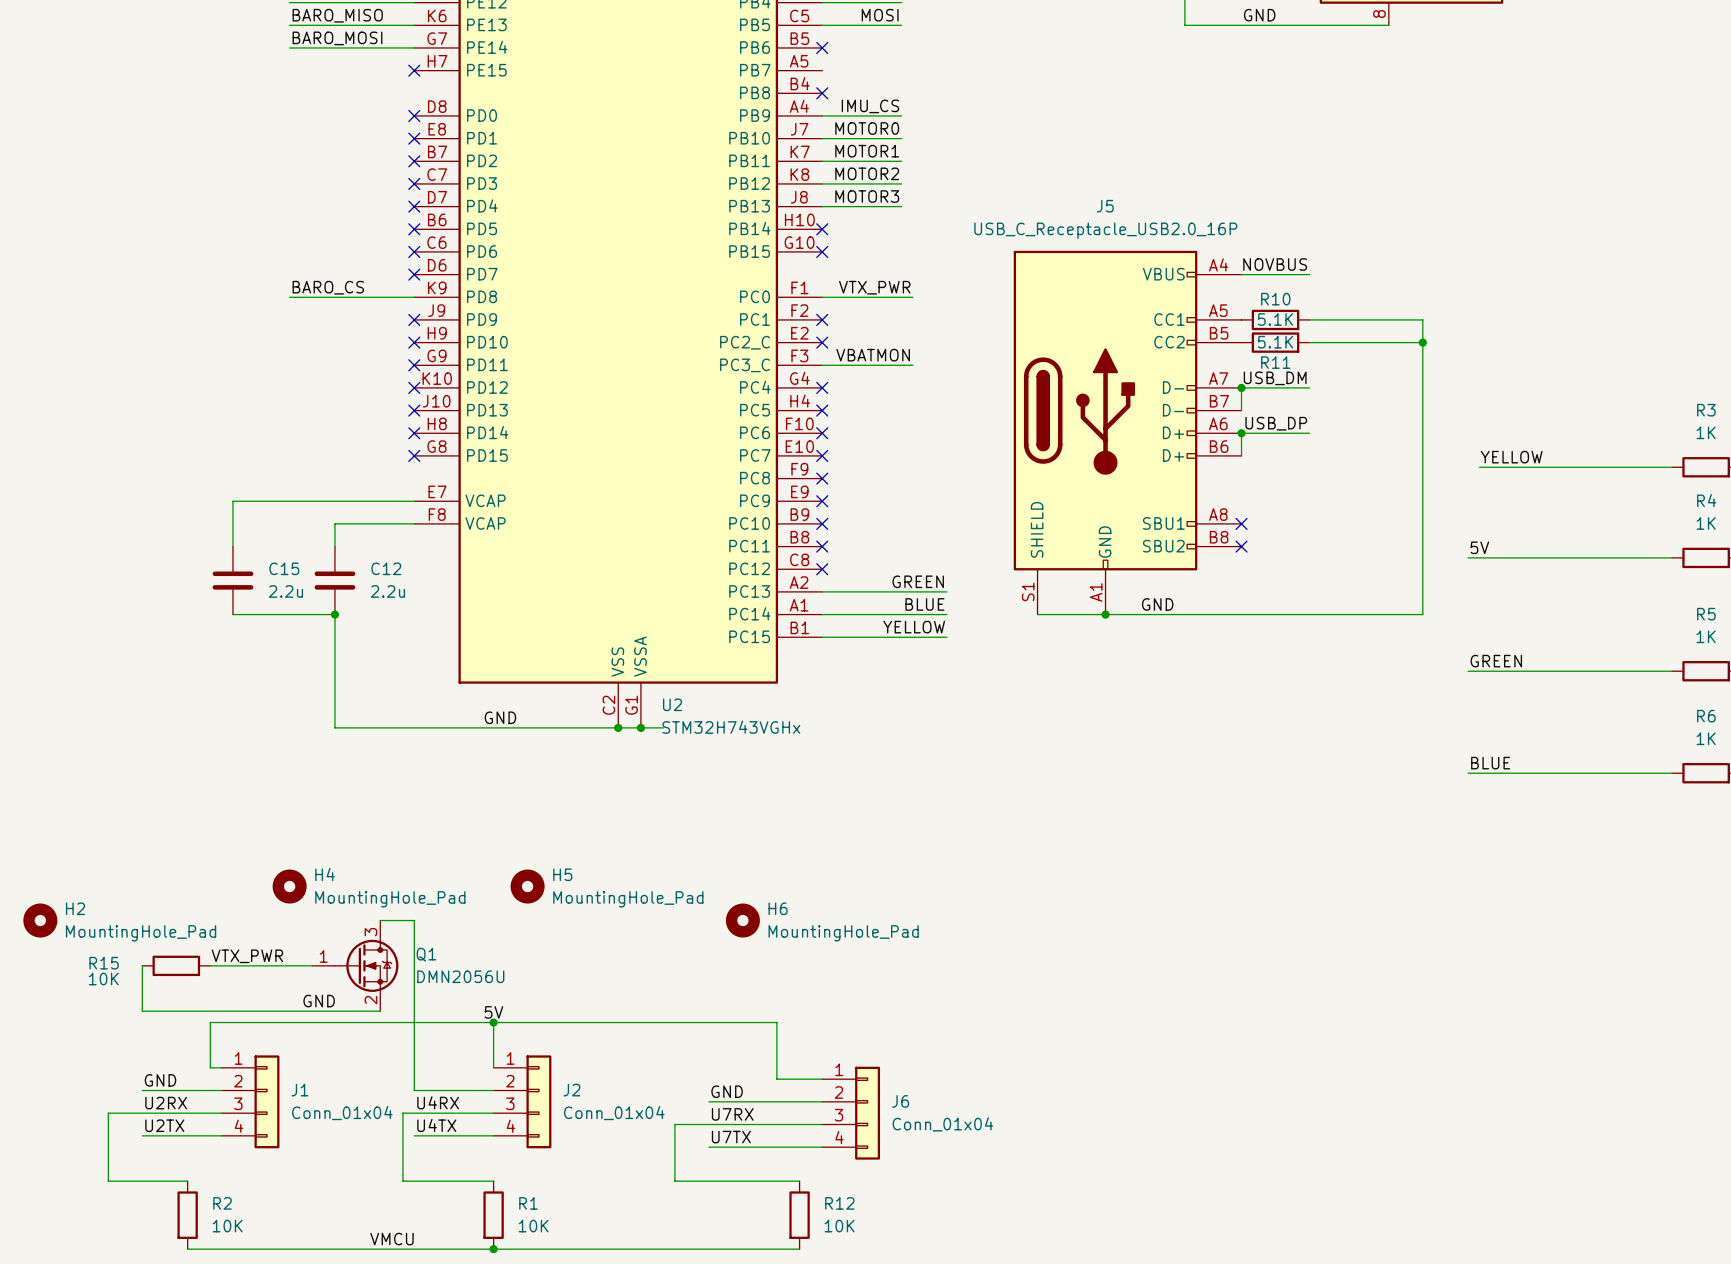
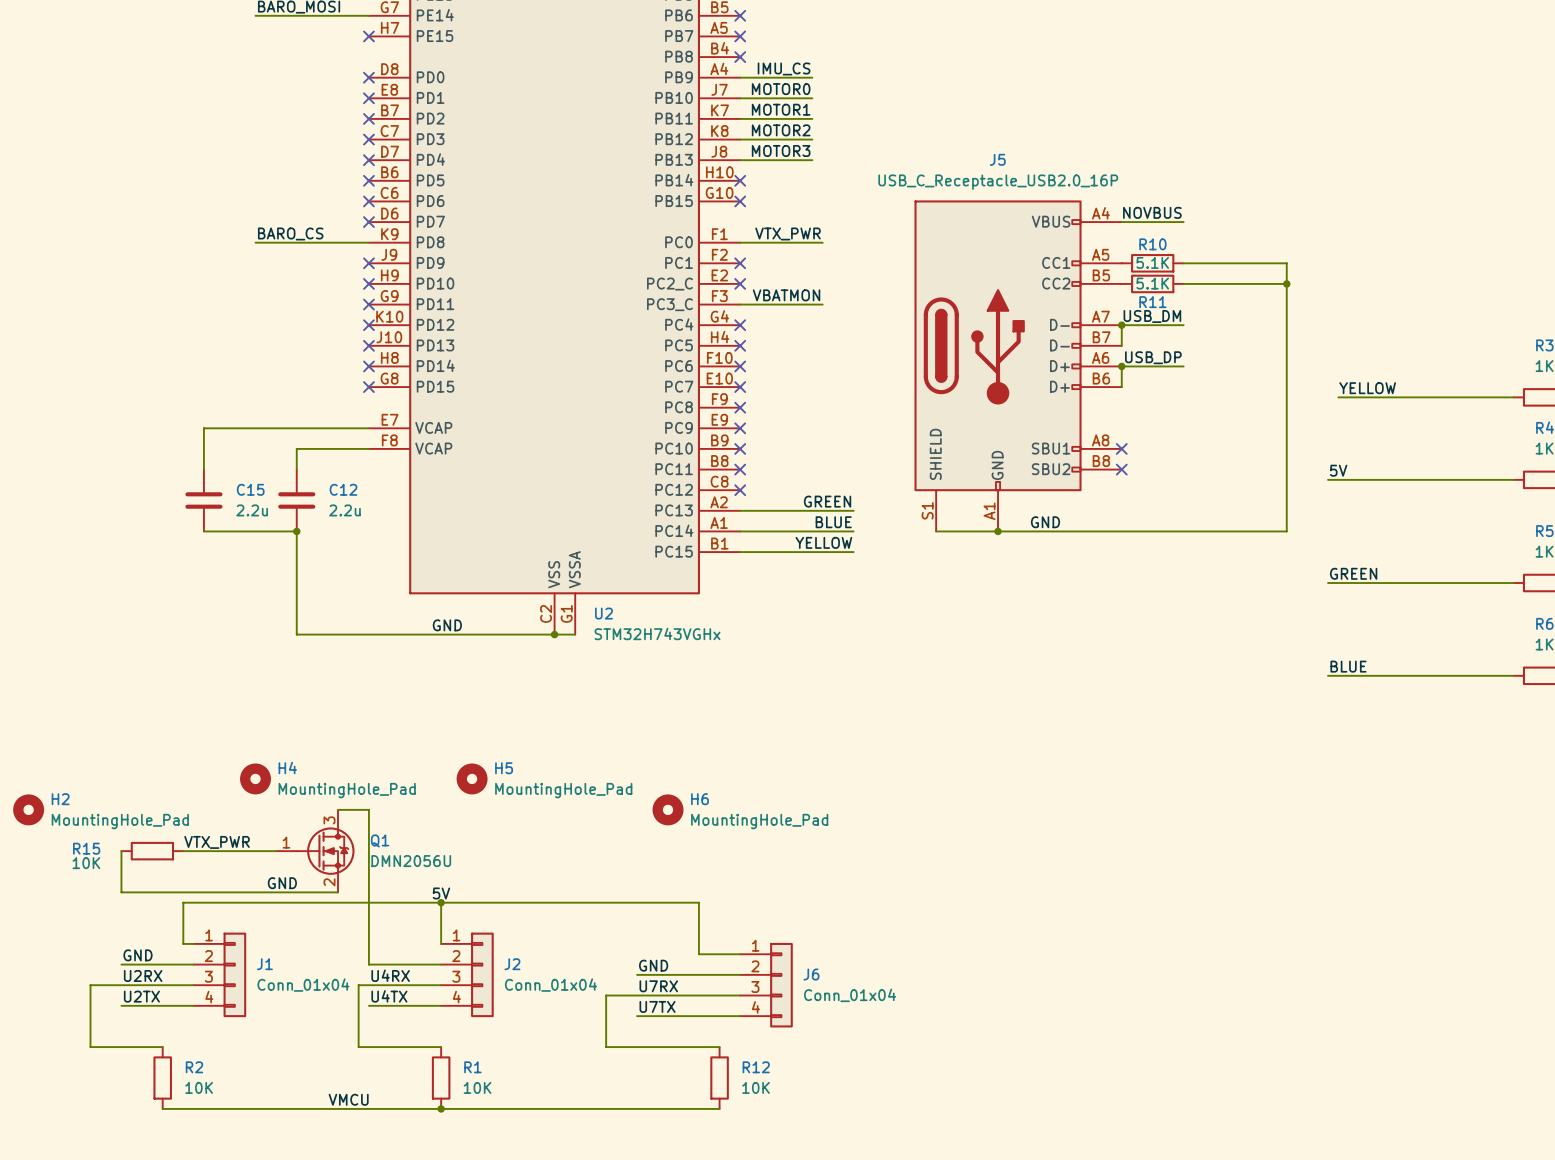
no-connect mark: none -> (740, 36)
wire: (640, 727) (663, 727) -> none
junction: (640, 727) -> none

